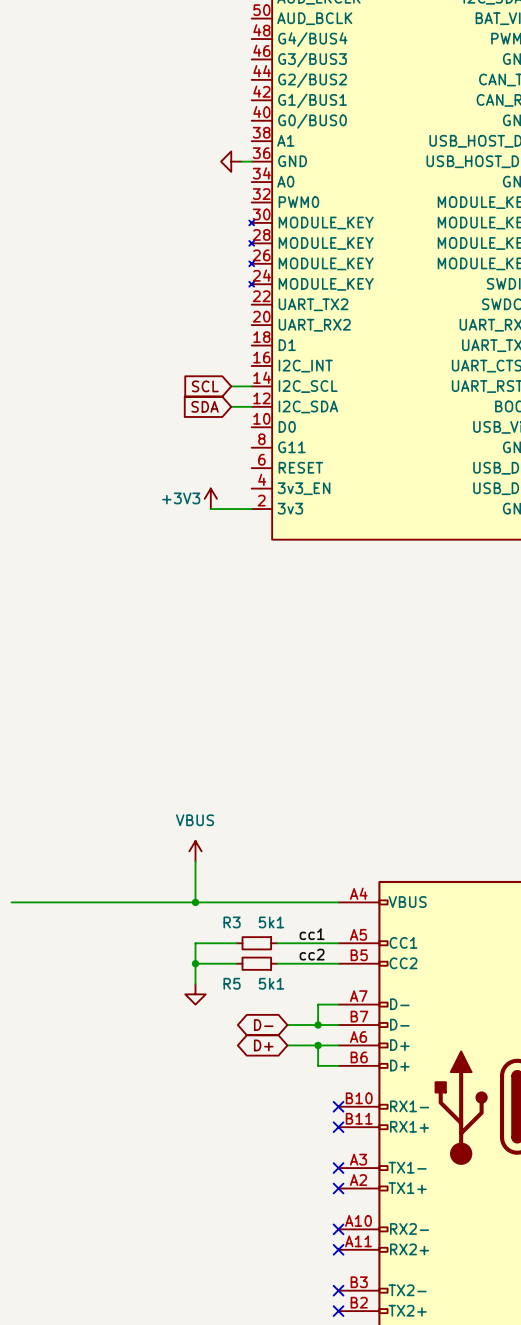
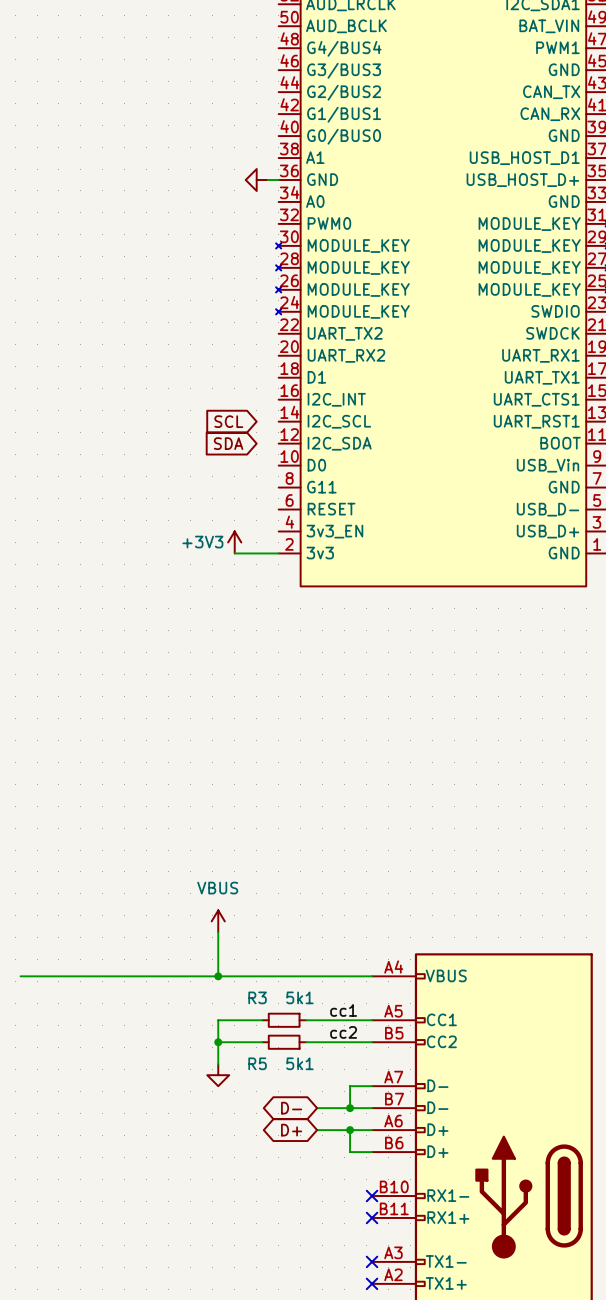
wire: (231, 386) (251, 386) -> none
wire: (231, 406) (251, 406) -> none

